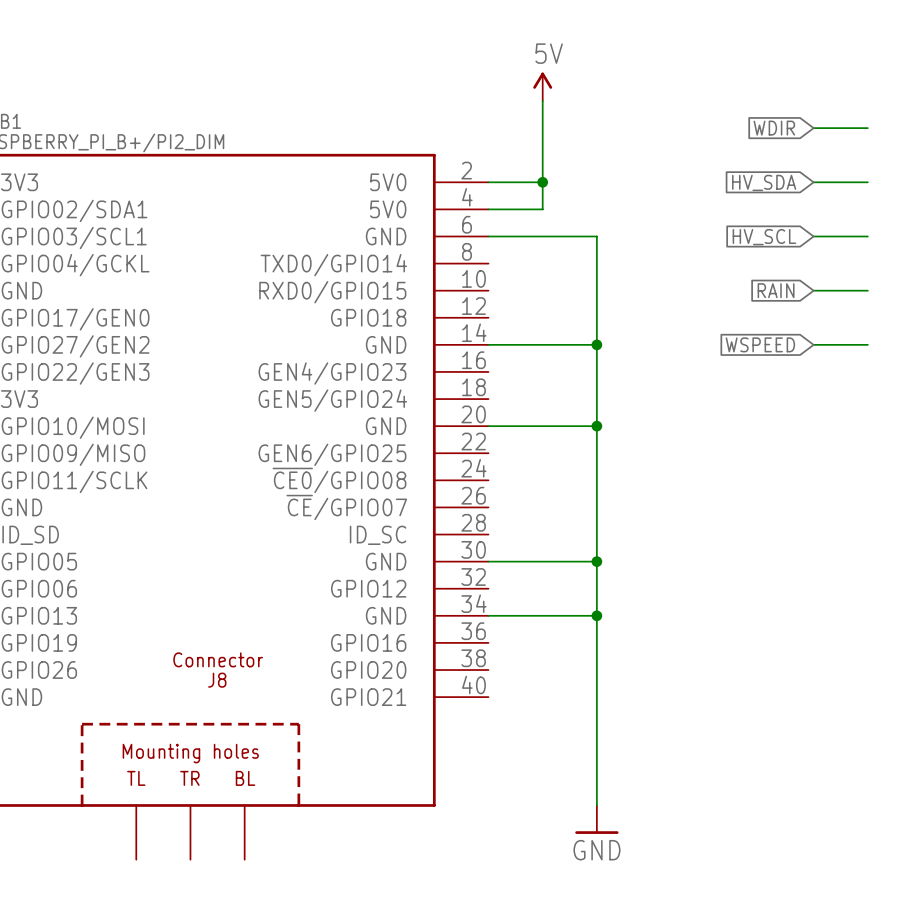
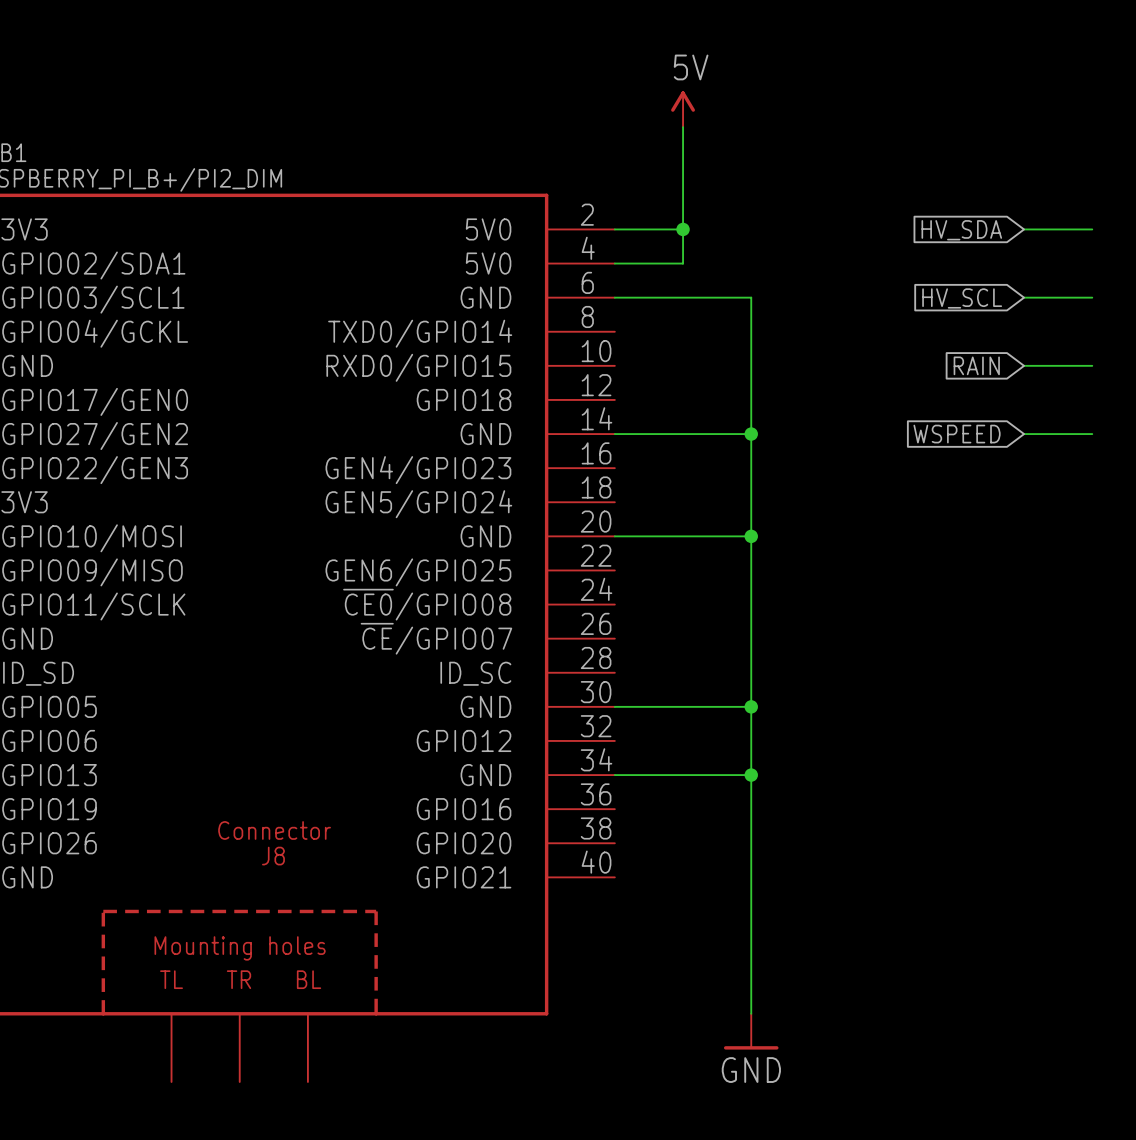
global label: WDIR (774, 128) -> none
wire: (813, 128) (867, 128) -> none

